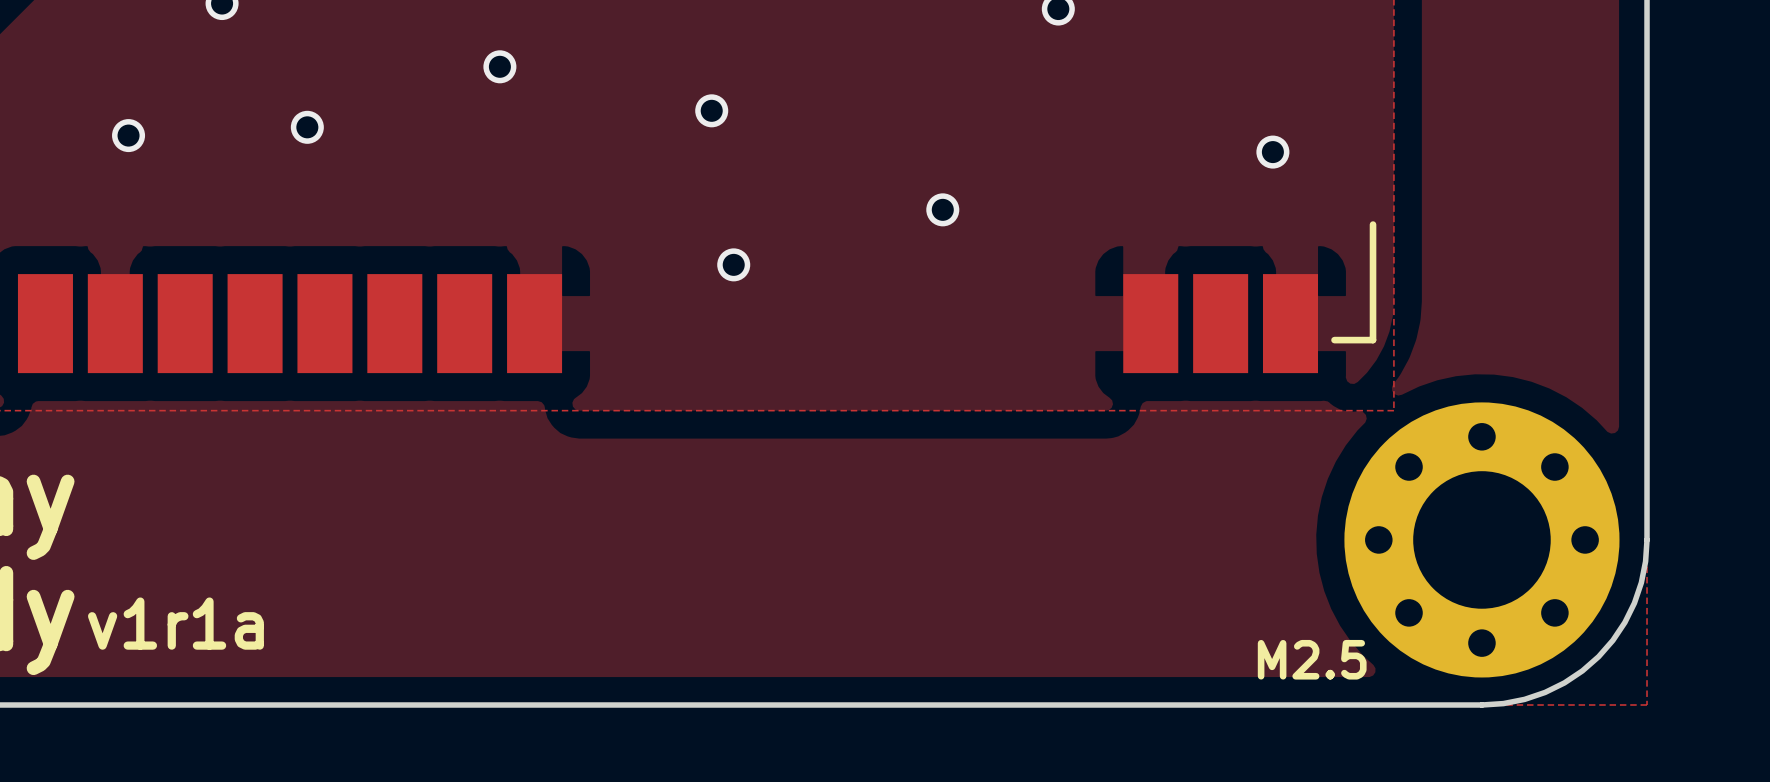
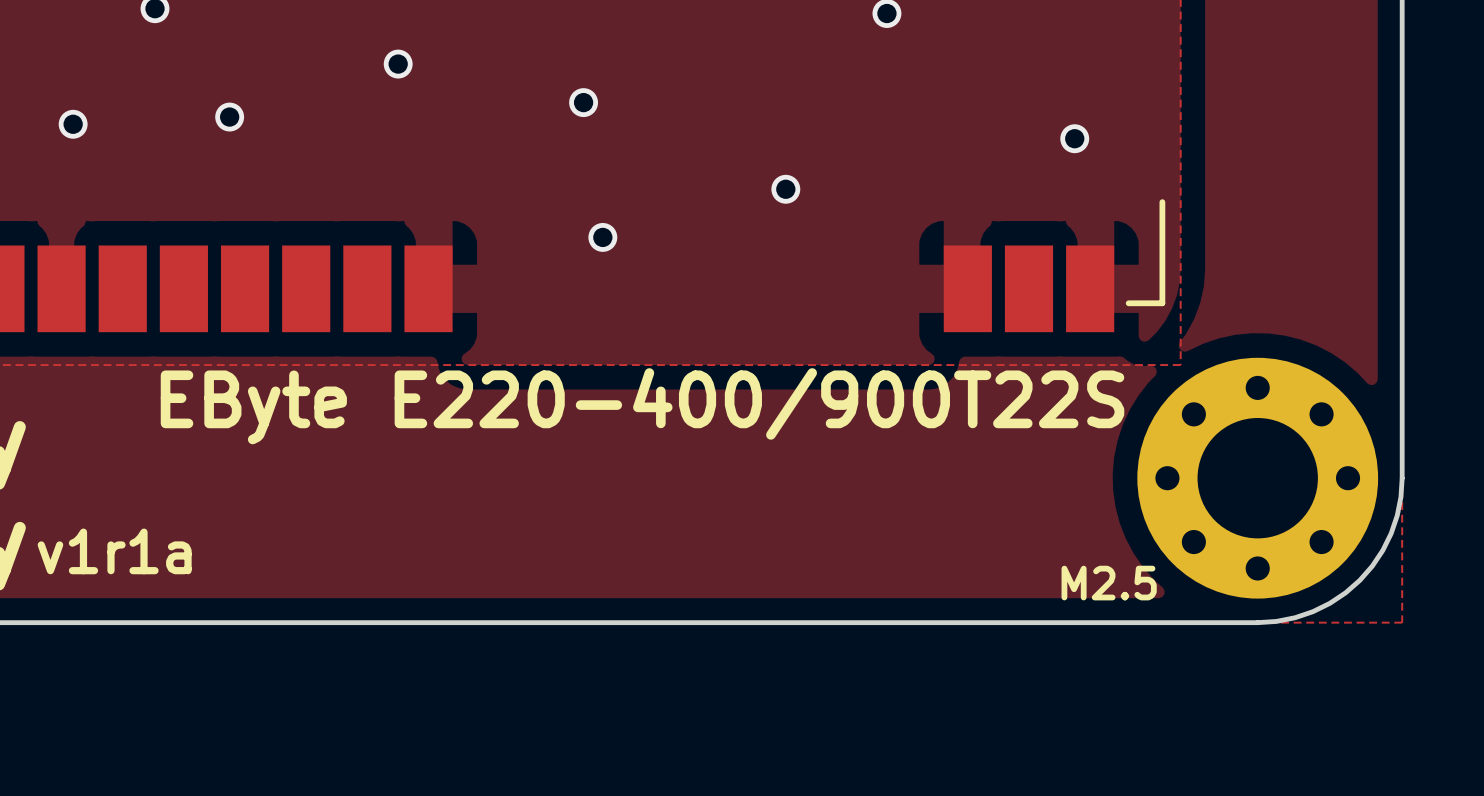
part value: none -> EByte E220-400/900T22S (642, 406)

